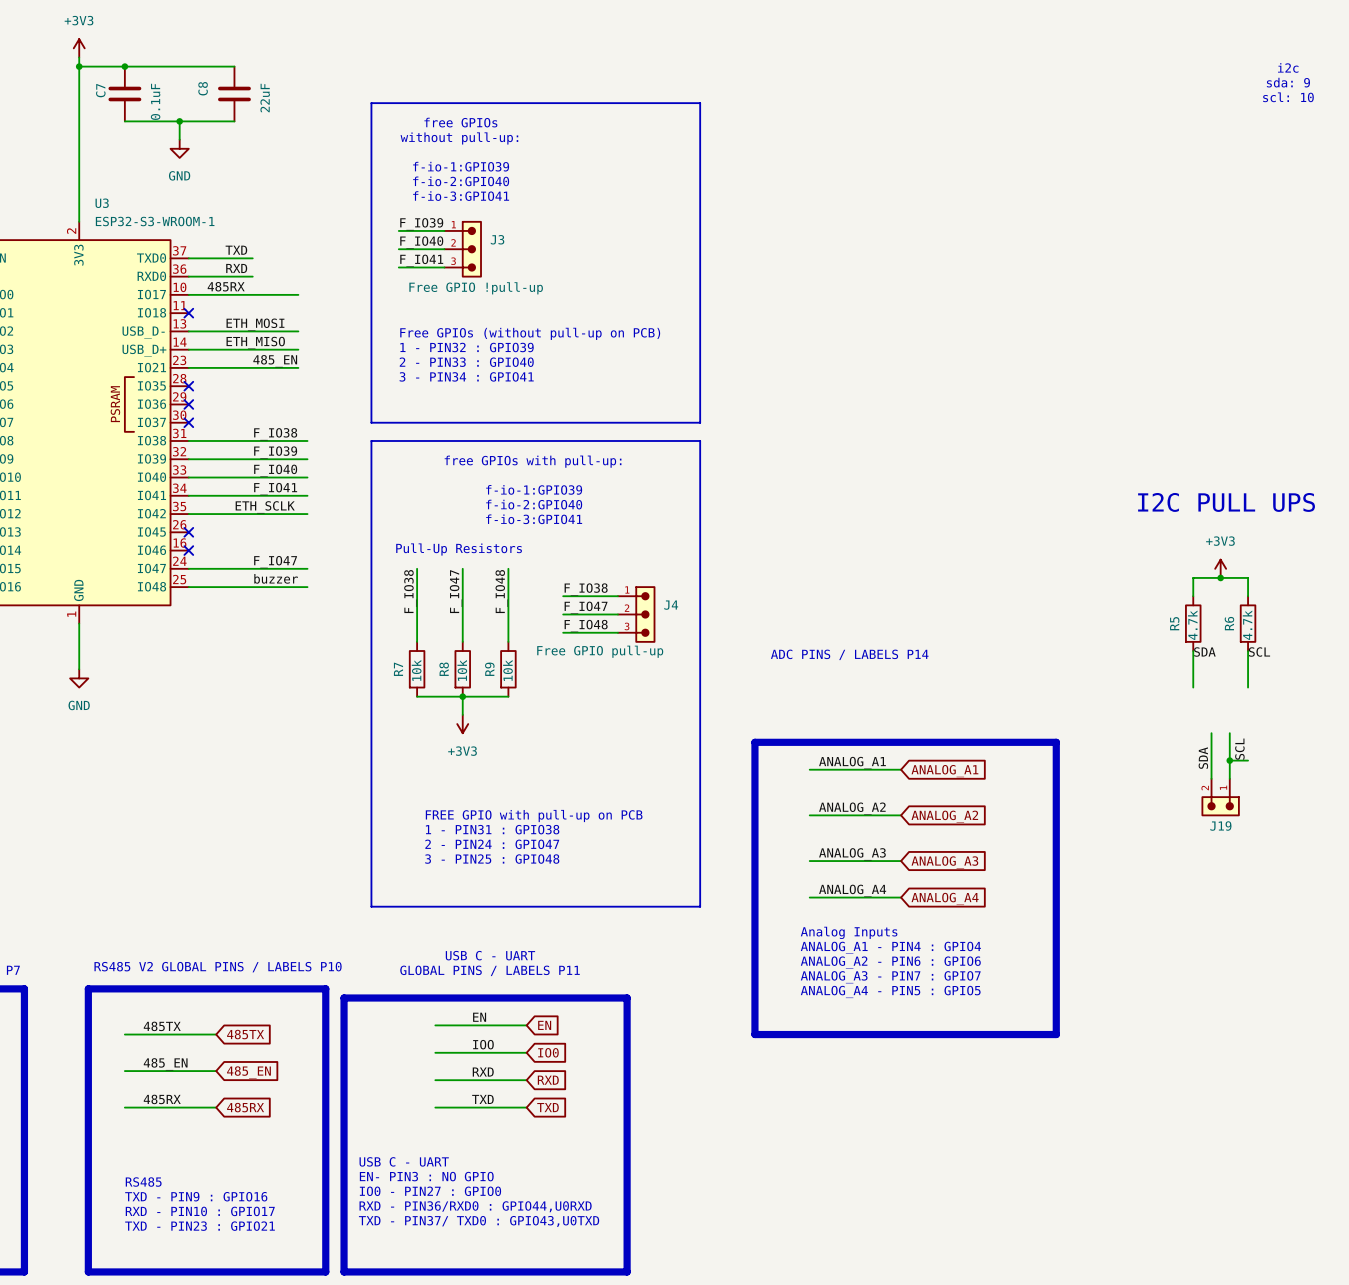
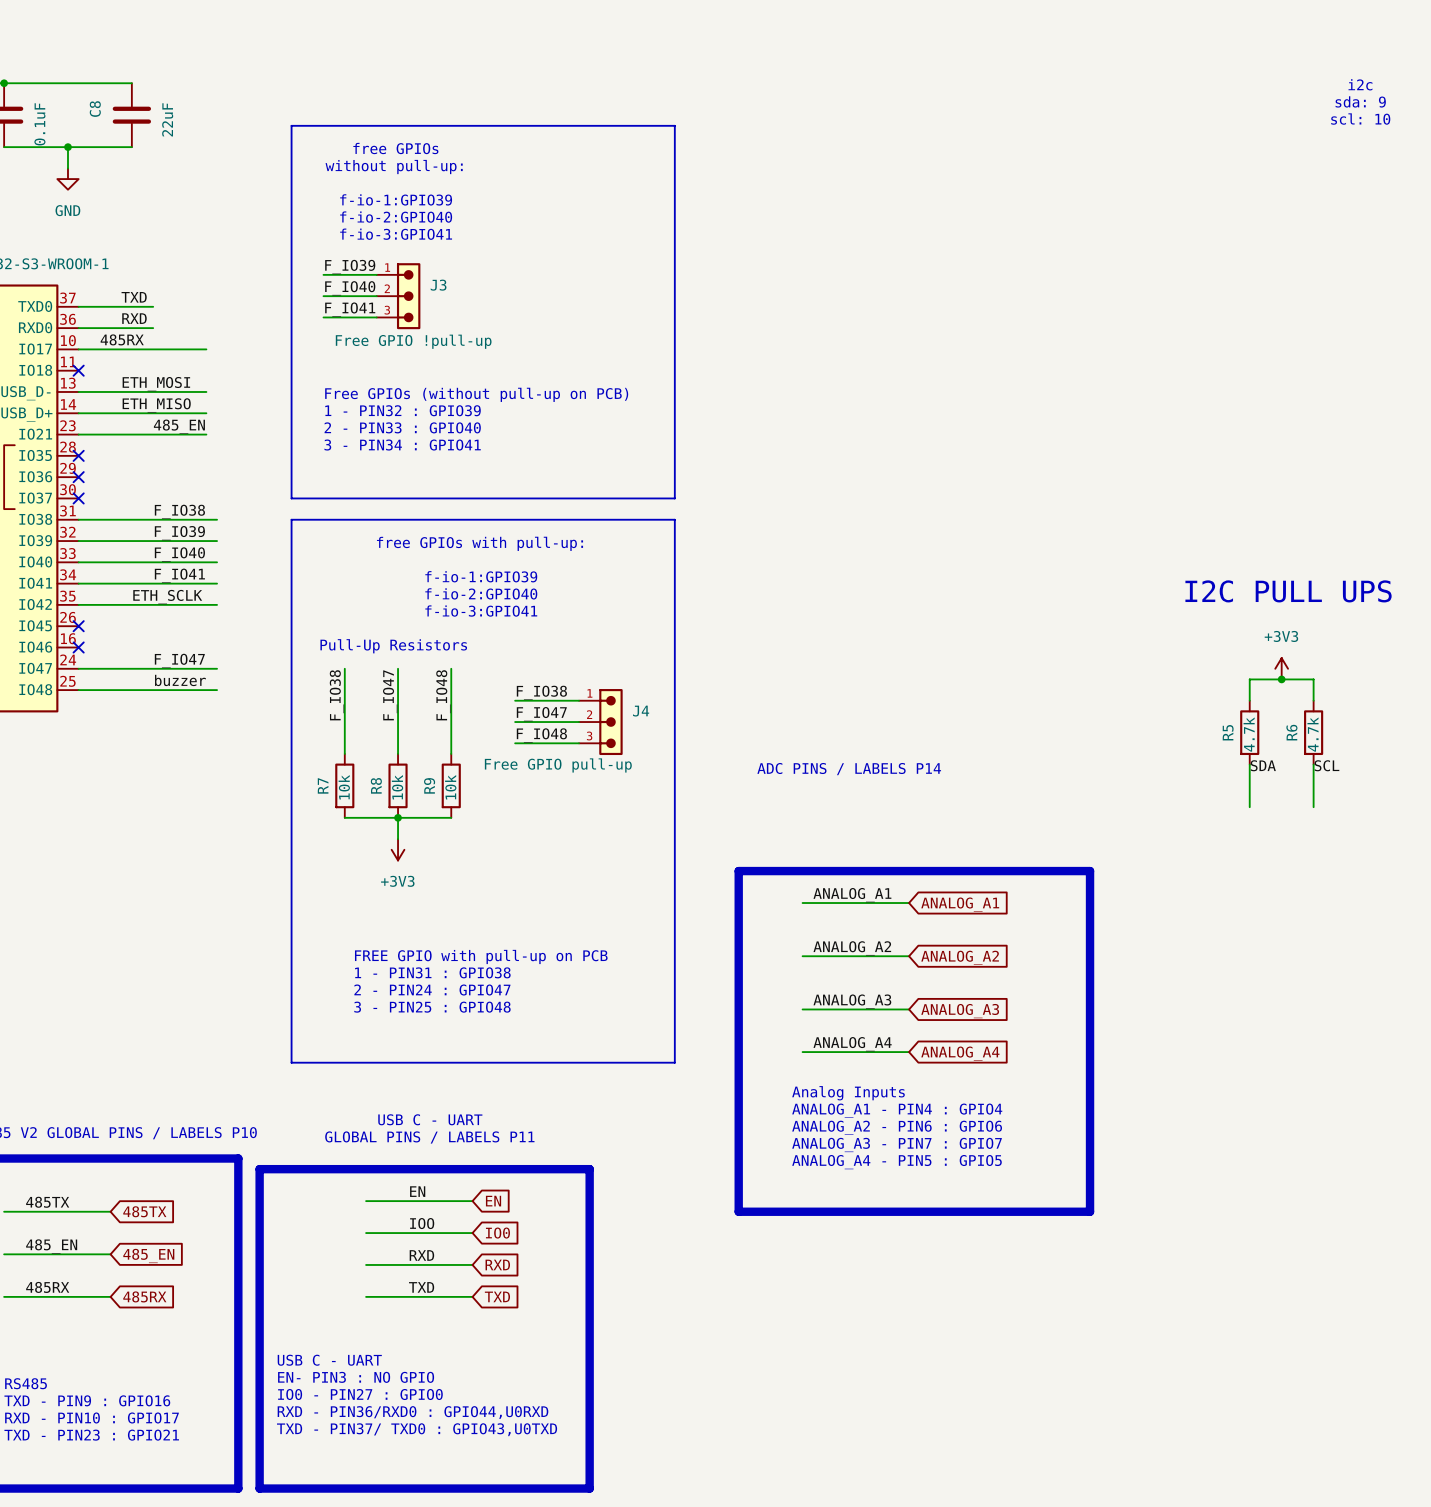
wire: (1211, 733) (1211, 778) -> none
wire: (1229, 733) (1229, 778) -> none
label: SCL (1239, 749) -> none
label: SDA (1203, 758) -> none
wire: (1229, 760) (1248, 760) -> none
junction: (1229, 760) -> none
J19: (1220, 797) -> none

